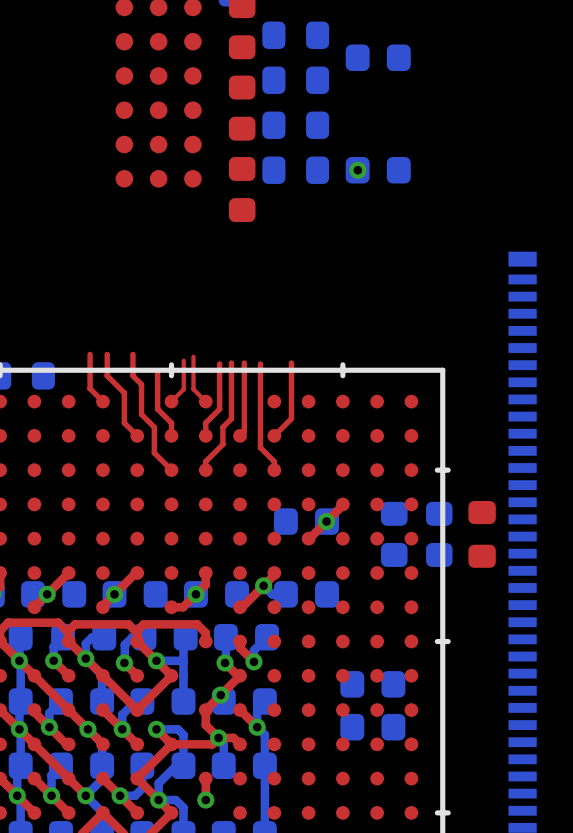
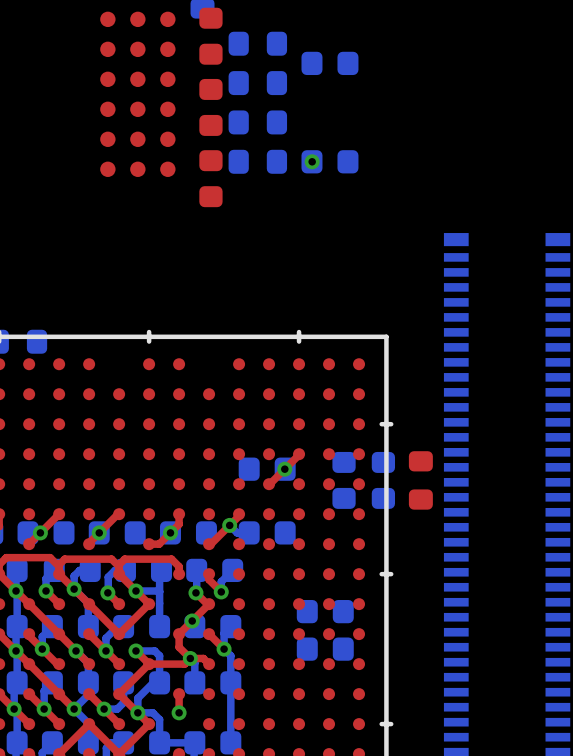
top track: (90, 354) (90, 388) (102, 401) -> none
top track: (107, 354) (107, 375) (124, 393) (124, 423) (137, 435) -> none
top track: (132, 354) (132, 375) (141, 384) (141, 414) (154, 427) (154, 453) (171, 470) -> none
top track: (193, 356) (193, 389) (205, 401) -> none
top track: (183, 360) (183, 389) (171, 401) -> none
top track: (231, 363) (231, 418) (222, 427) (222, 444) (205, 461) (205, 470) -> none
top track: (244, 363) (244, 431) (240, 435) -> none
top track: (291, 363) (291, 418) (274, 435) -> none
top track: (219, 364) (219, 409) (205, 423) (205, 435) -> none
top track: (260, 364) (260, 447) (274, 461) (274, 470) -> none
top track: (157, 372) (157, 409) (171, 423) (171, 435) -> none

